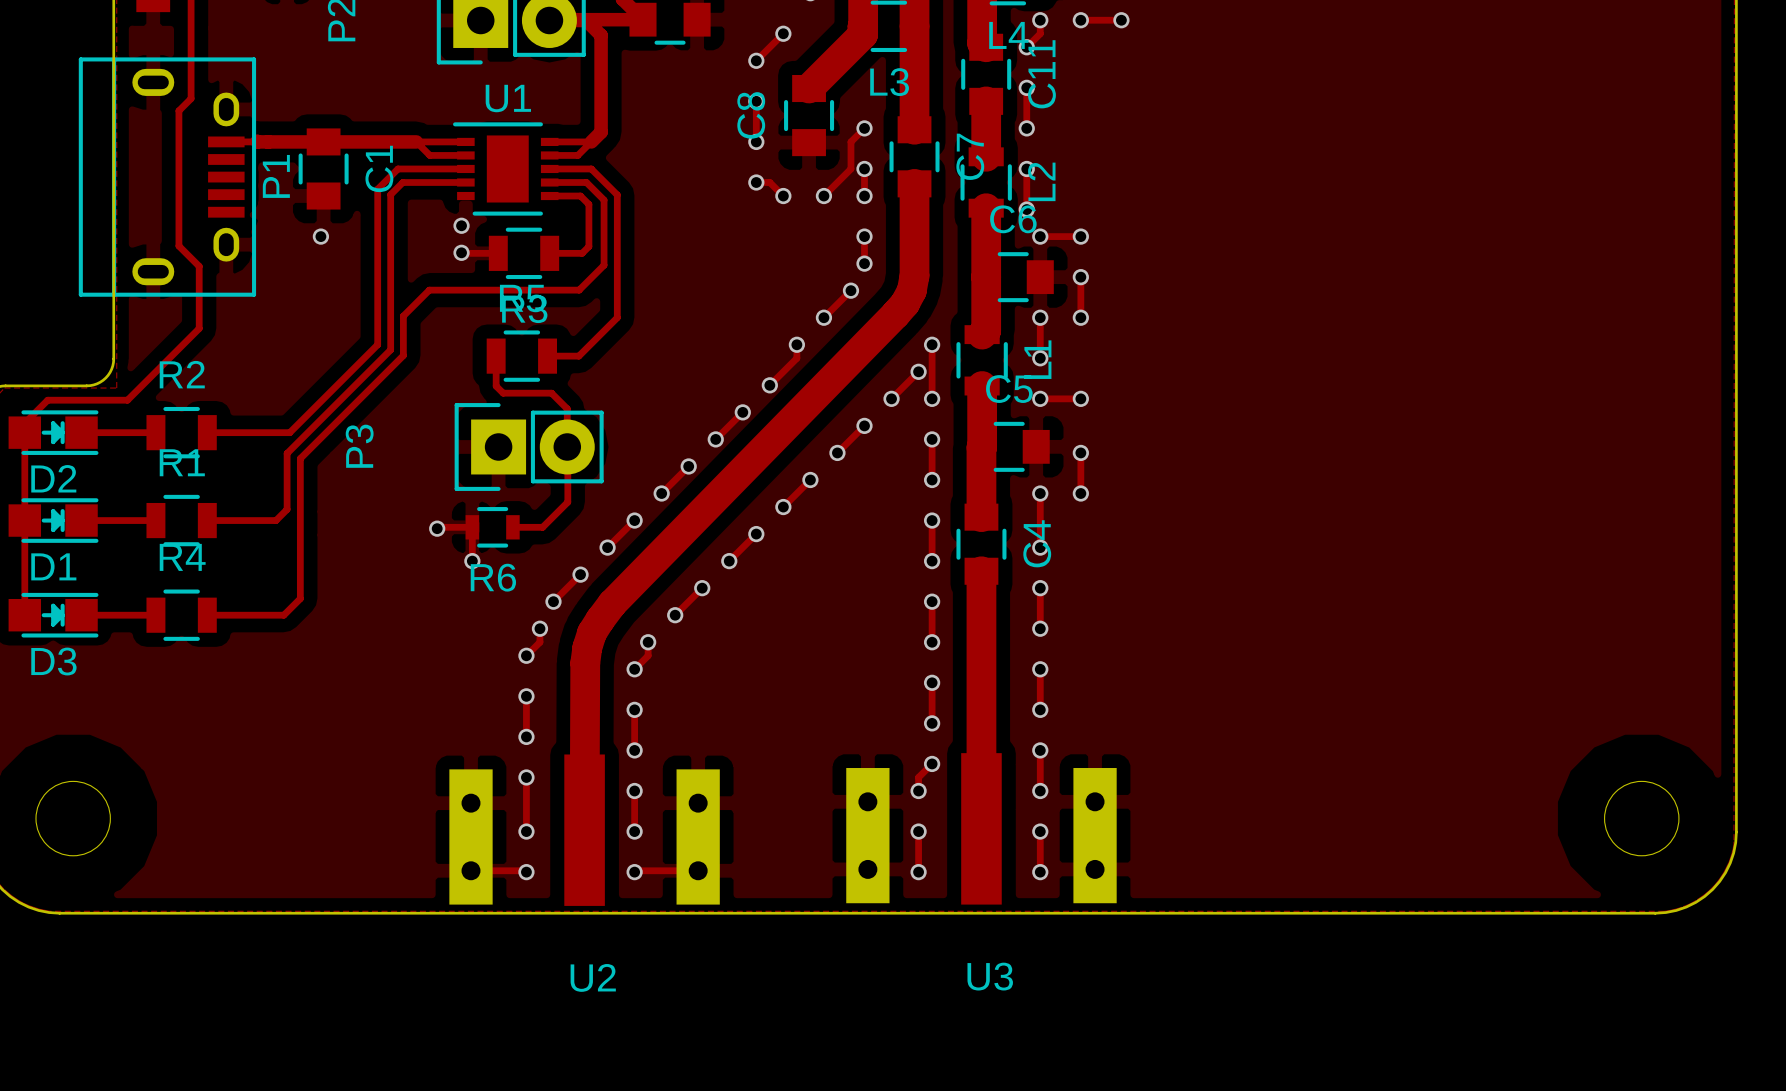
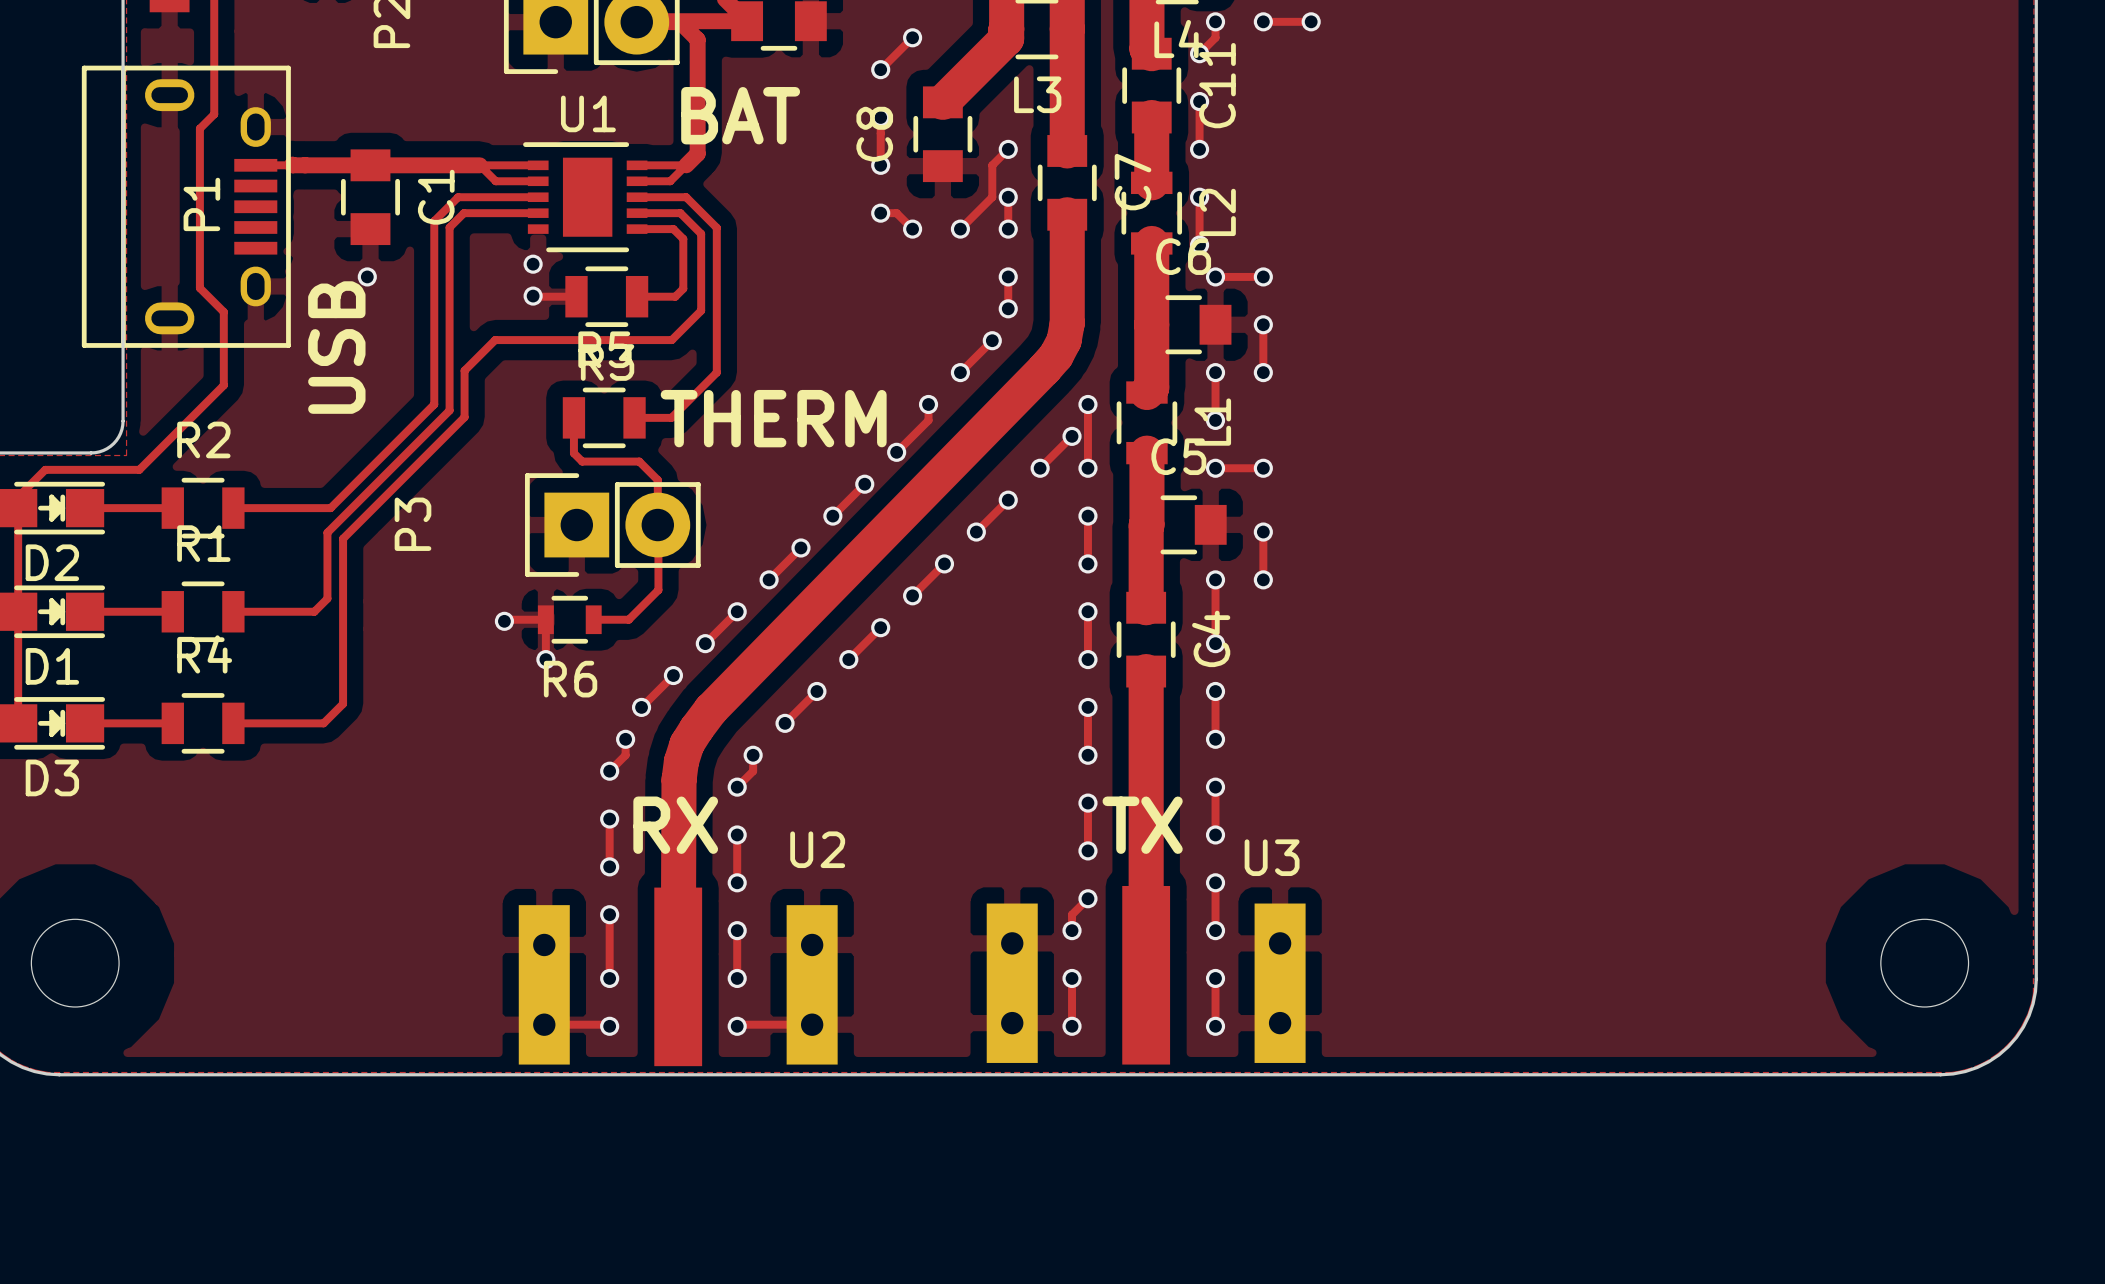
text: none -> BAT (740, 115)
P1 name position: P1 (276, 176) -> P1 (201, 204)
text: none -> USB (336, 347)
text: none -> THERM (773, 418)
text: none -> RX (675, 825)
text: none -> TX (1142, 825)
U3 name position: U3 (990, 976) -> U3 (1272, 857)
U2 name position: U2 (593, 977) -> U2 (817, 849)

